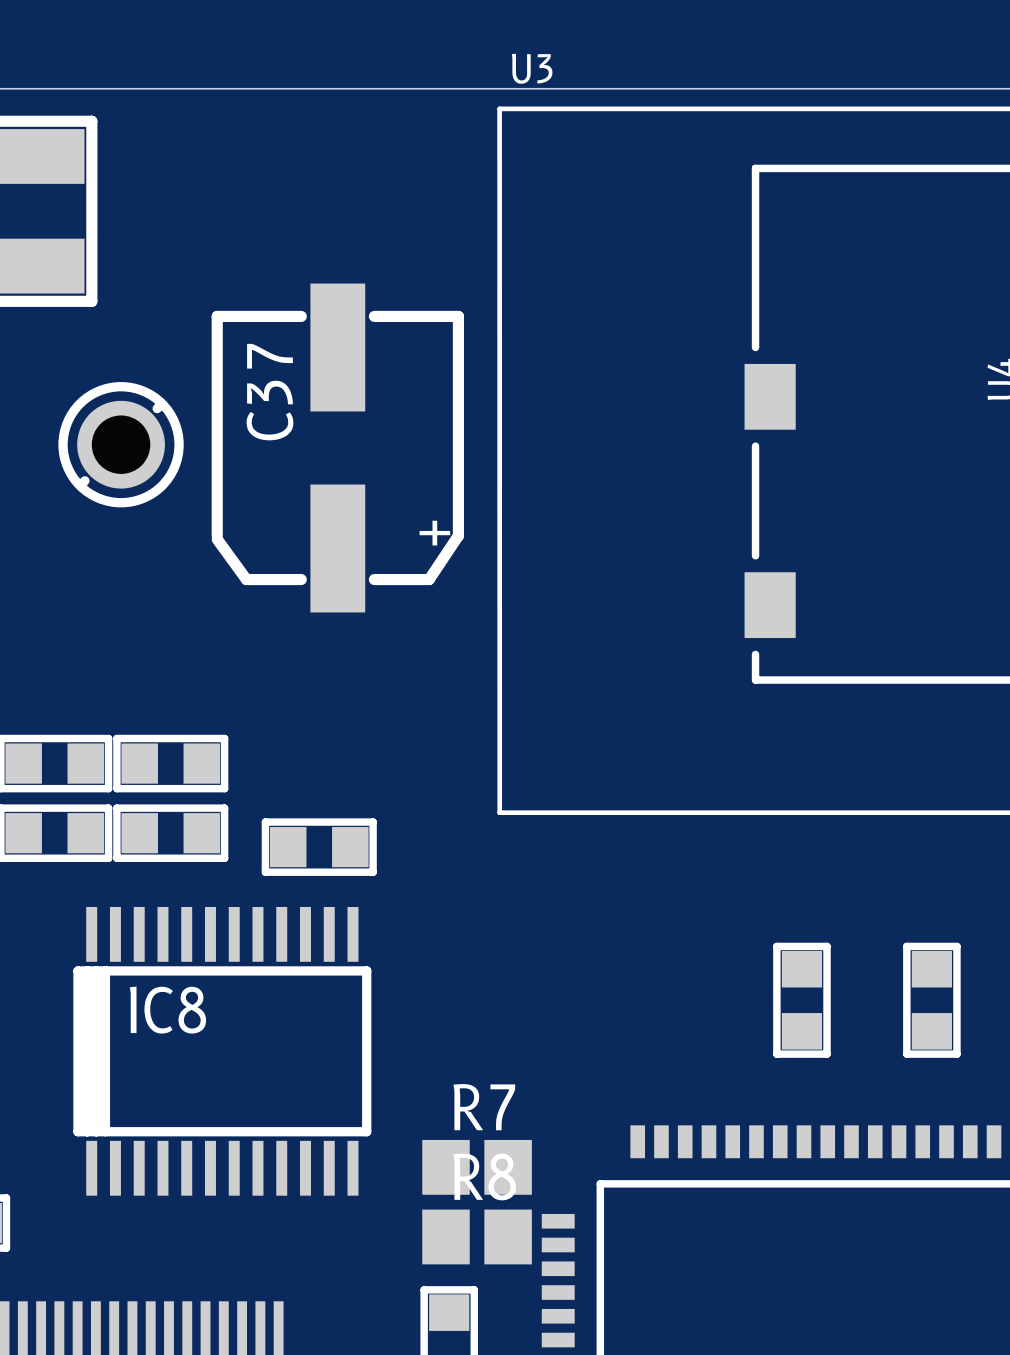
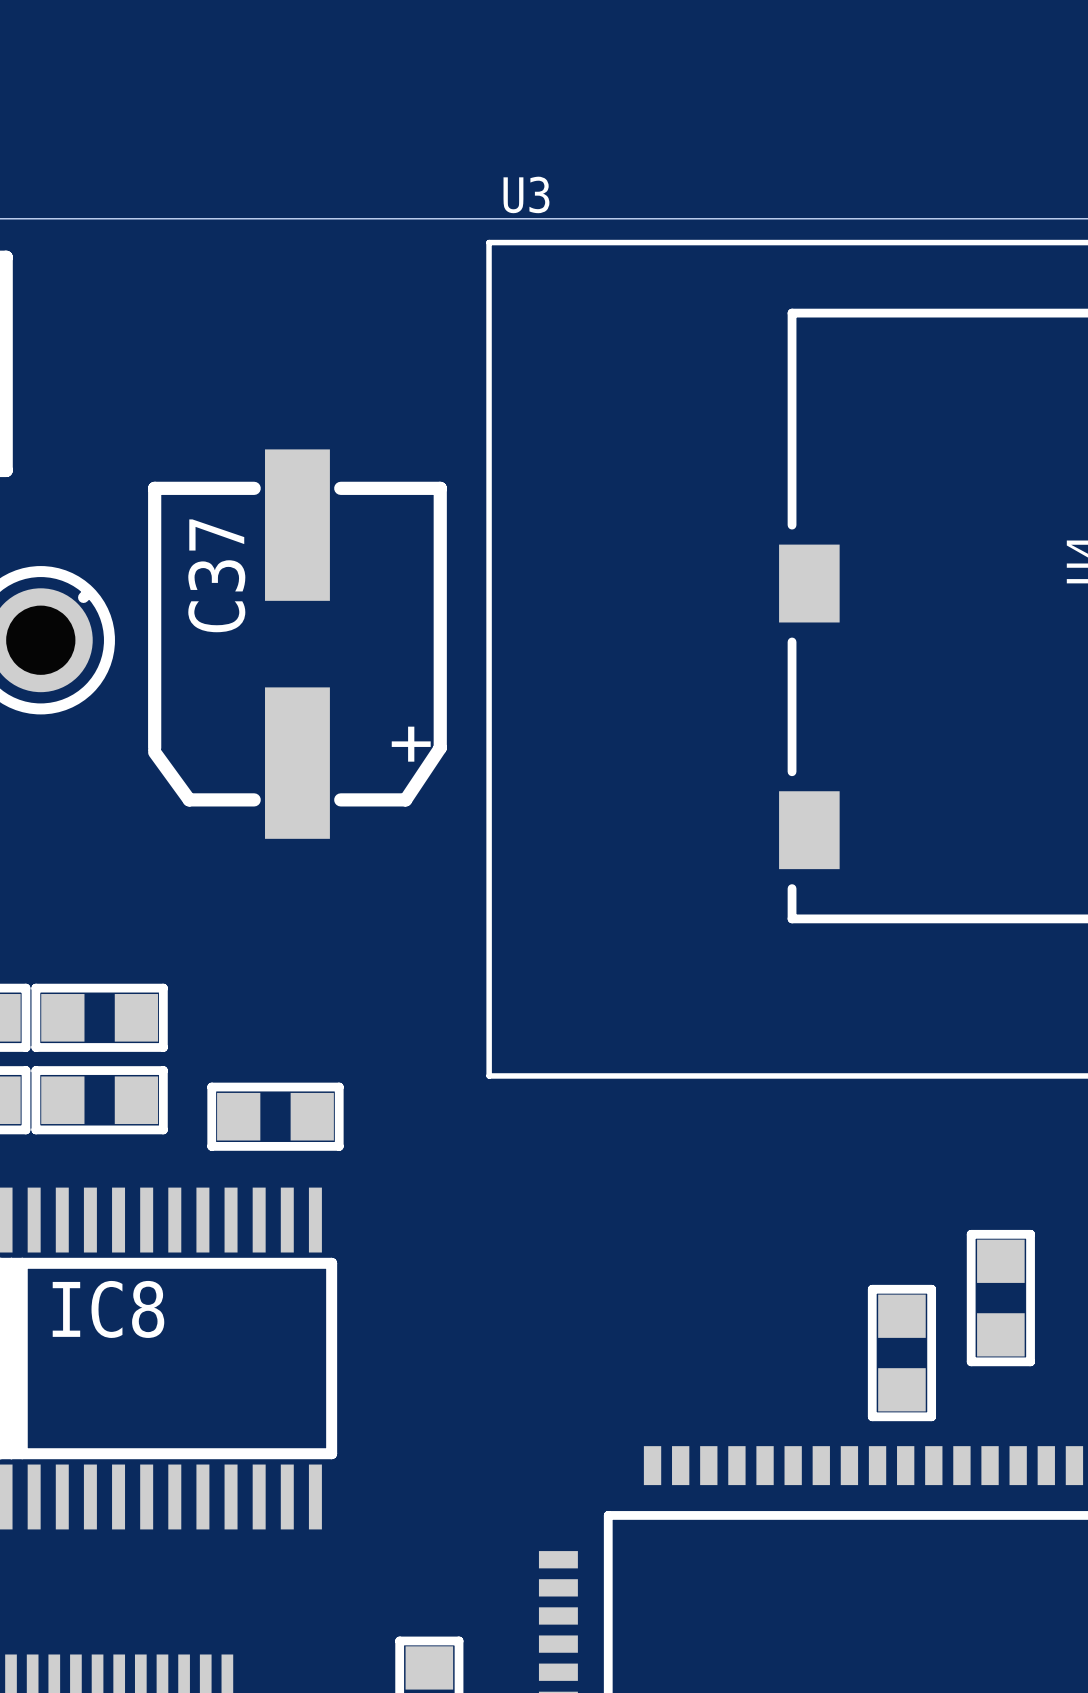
part position: (801, 1000) -> (901, 1353)
R7: (477, 1167) -> none
part: (477, 1236) -> none

